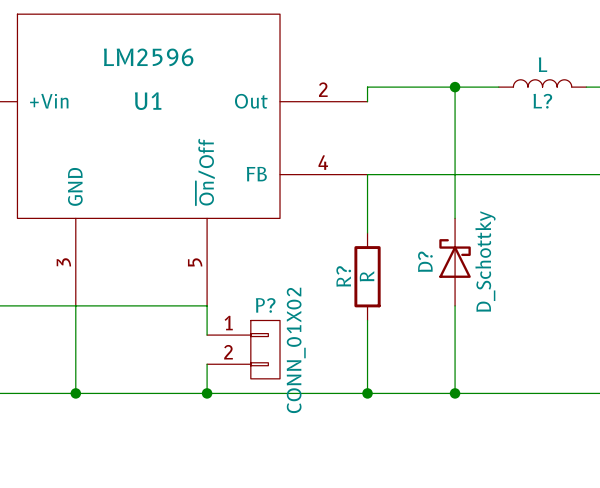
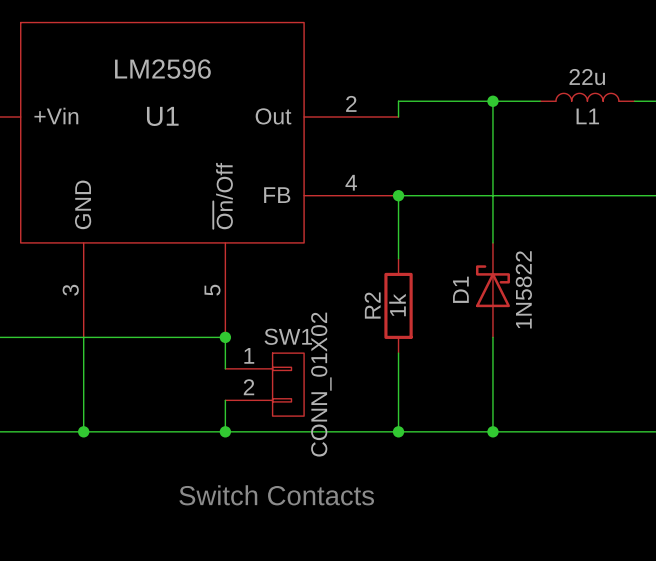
L? value: L (543, 64) -> 22u (587, 77)
L? name: L? (542, 101) -> L1 (587, 116)
junction: none -> (398, 195)
D? name: D? (425, 261) -> D1 (460, 289)
D? value: D_Schottky (485, 261) -> 1N5822 (523, 289)
R? name: R? (343, 276) -> R2 (372, 305)
R? value: R (367, 276) -> 1k (397, 305)
junction: none -> (225, 337)
P? name: P? (265, 305) -> SW1 (288, 336)
text: none -> Switch Contacts (276, 495)

